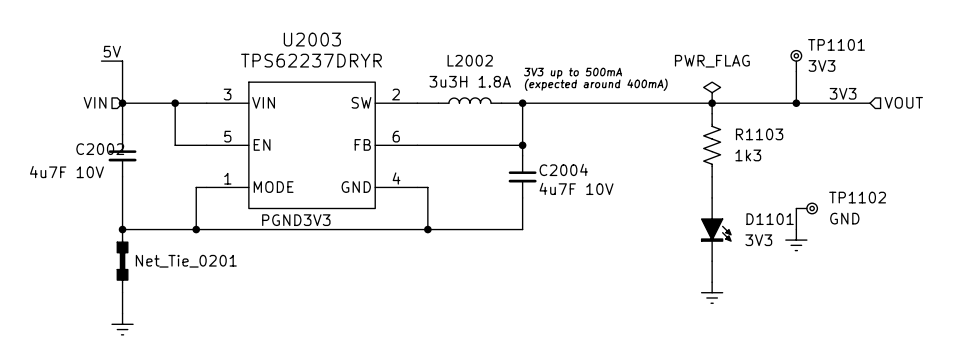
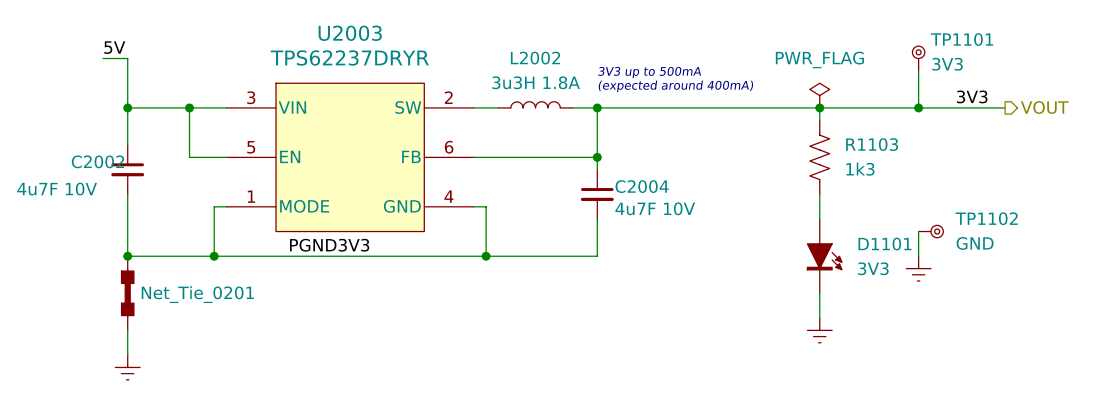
hierarchical label: VIN (95, 102) -> none
hierarchical label shape: input (903, 102) -> output (1044, 107)

